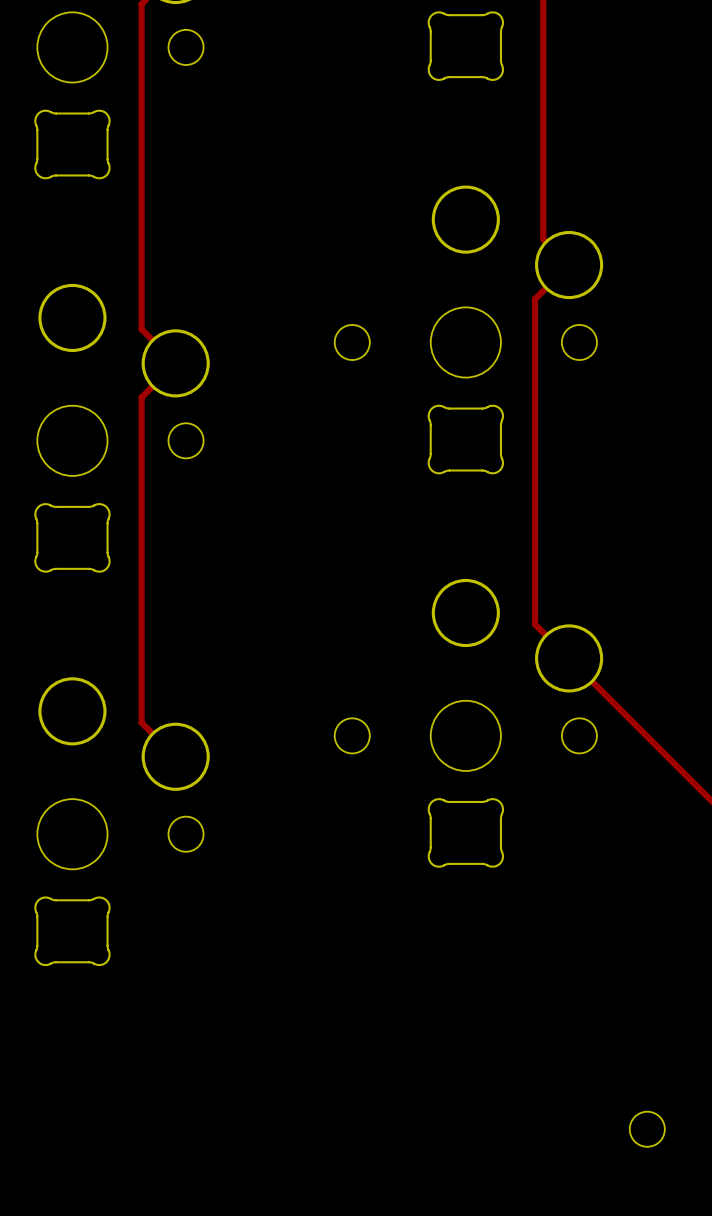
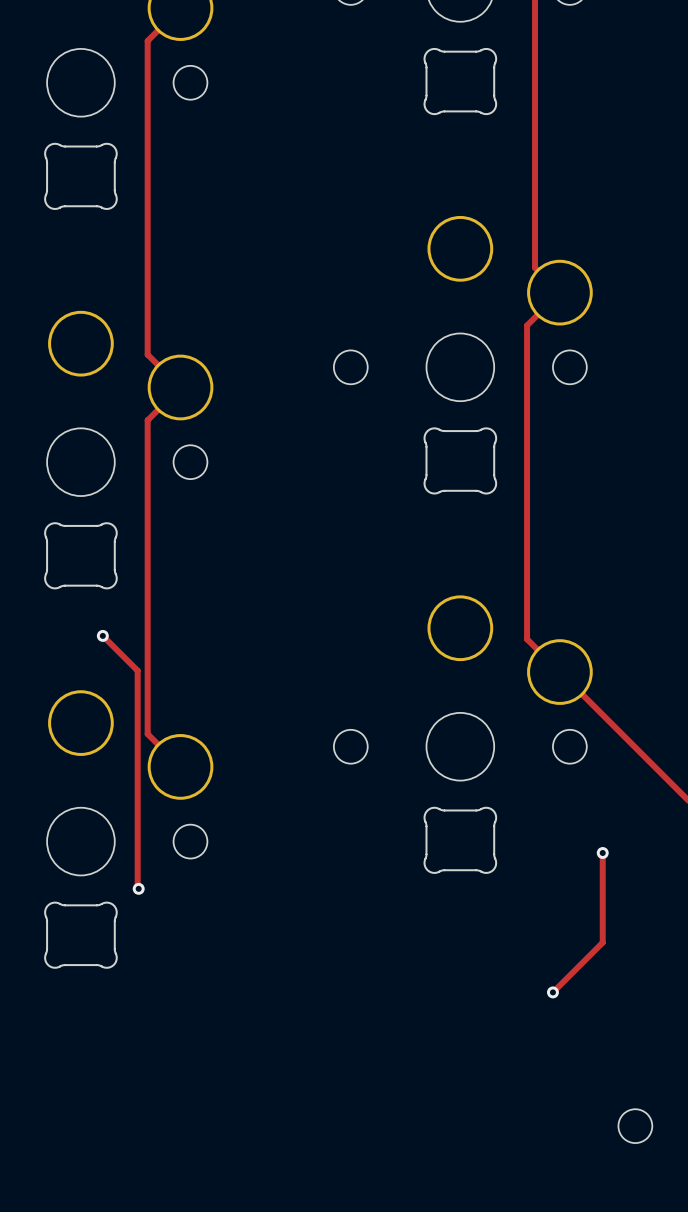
track: none -> (102, 635) (137, 670) (138, 888)
via: none -> (102, 635)
track: none -> (602, 853) (602, 942) (552, 992)
via: none -> (602, 853)
via: none -> (138, 888)
via: none -> (552, 992)

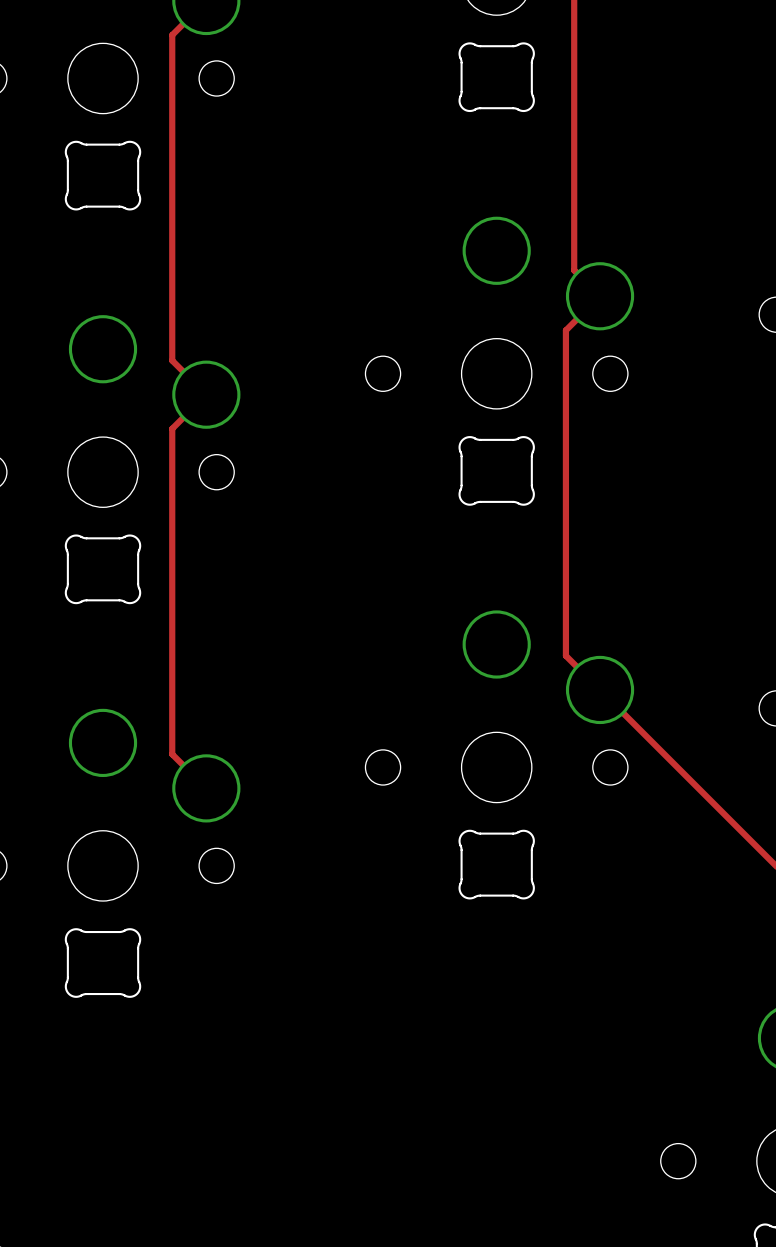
track: (102, 635) (137, 670) (138, 888) -> none
via: (102, 635) -> none
track: (602, 853) (602, 942) (552, 992) -> none
via: (602, 853) -> none
via: (138, 888) -> none
via: (552, 992) -> none

